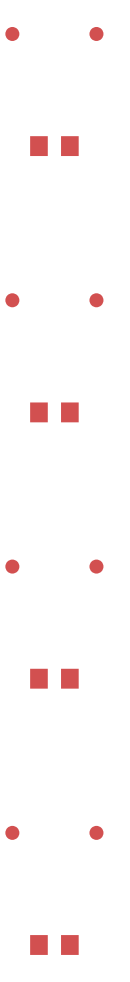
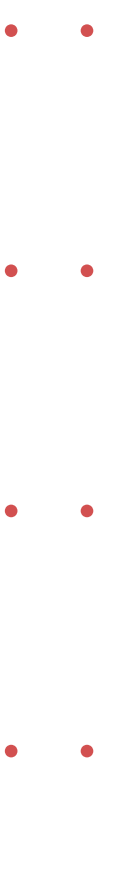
part: (54, 146) -> none
part: (54, 412) -> none
part: (54, 678) -> none
part: (54, 945) -> none

